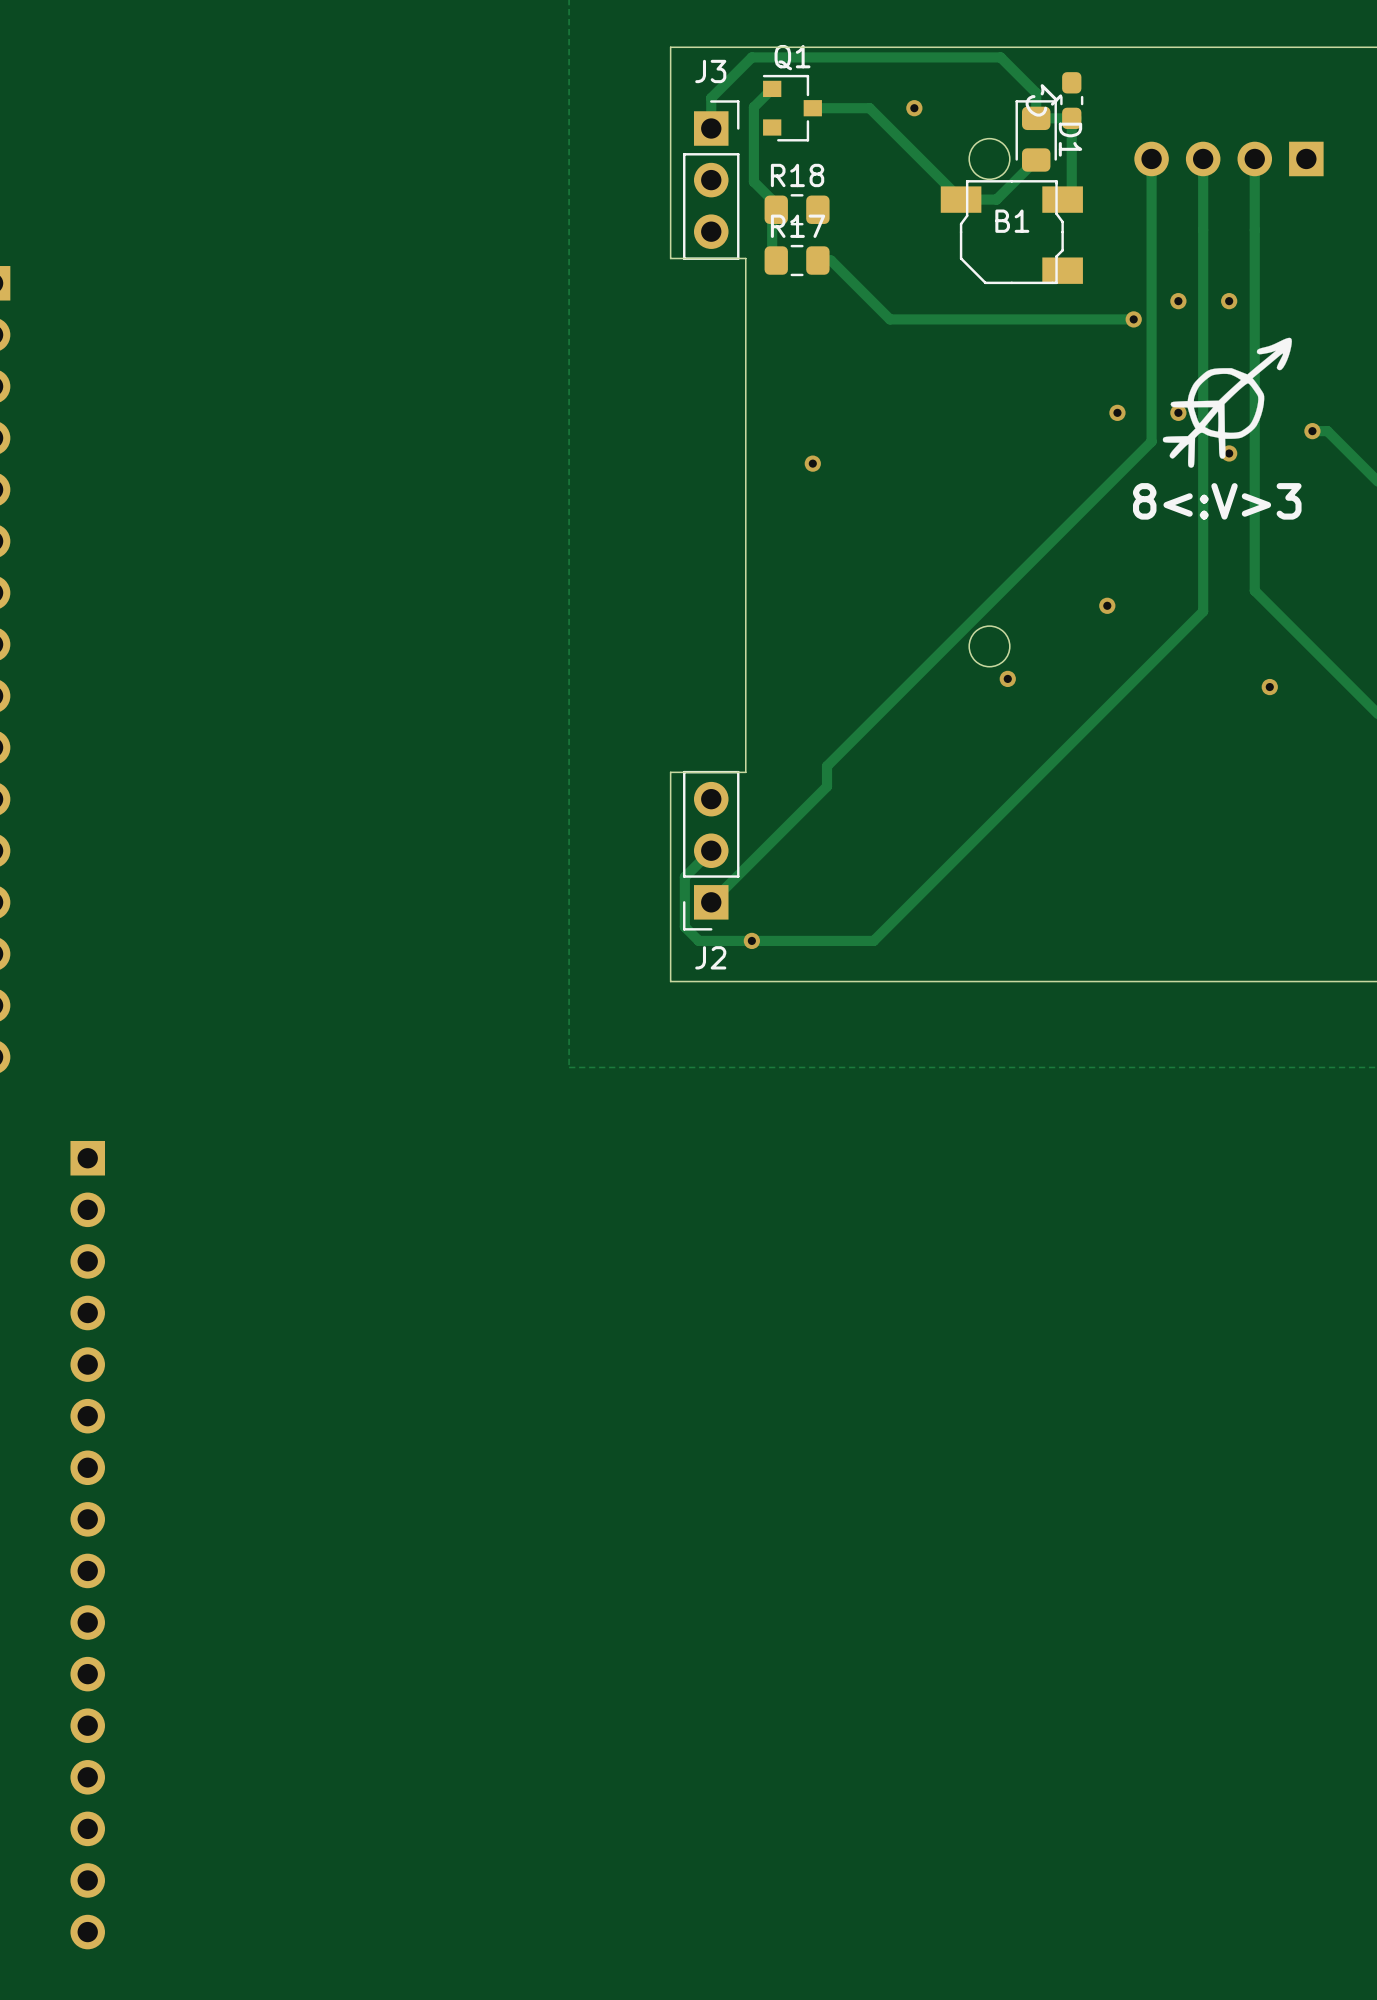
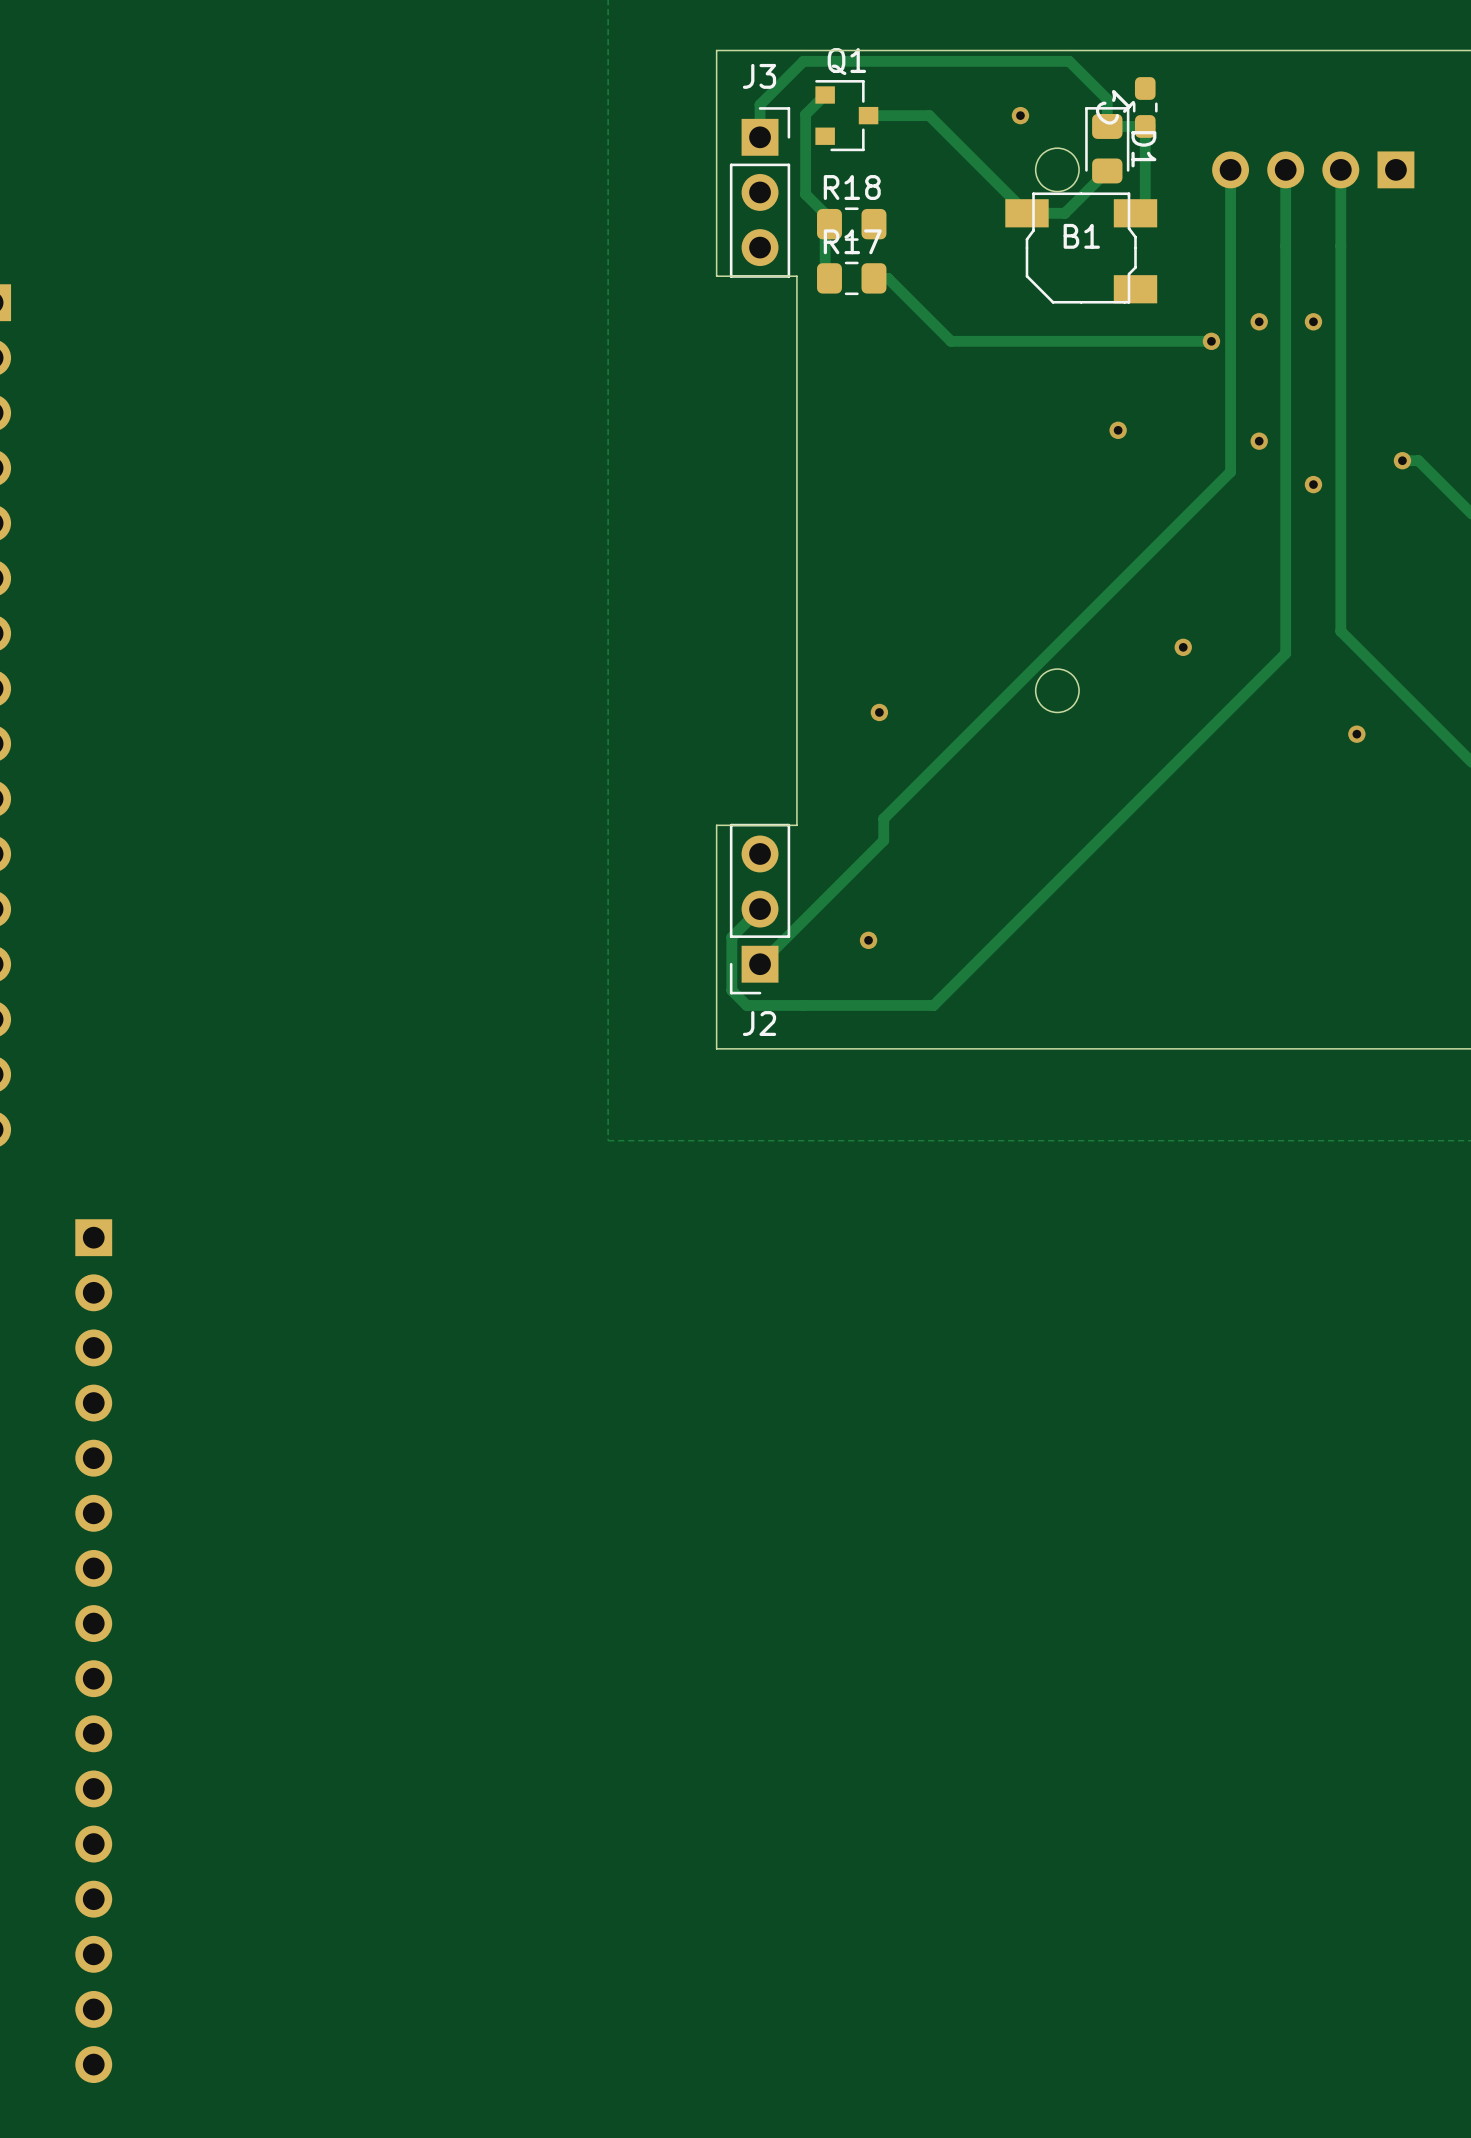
via position: (914, 108) -> (1020, 115)
drawing: [1162, 337, 1292, 468] -> none
via position: (1117, 412) -> (1118, 430)
via: (812, 463) -> none
text: 8<:V>3 (1217, 501) -> none
via: none -> (879, 712)
via: (1007, 678) -> none
via position: (751, 940) -> (868, 940)

